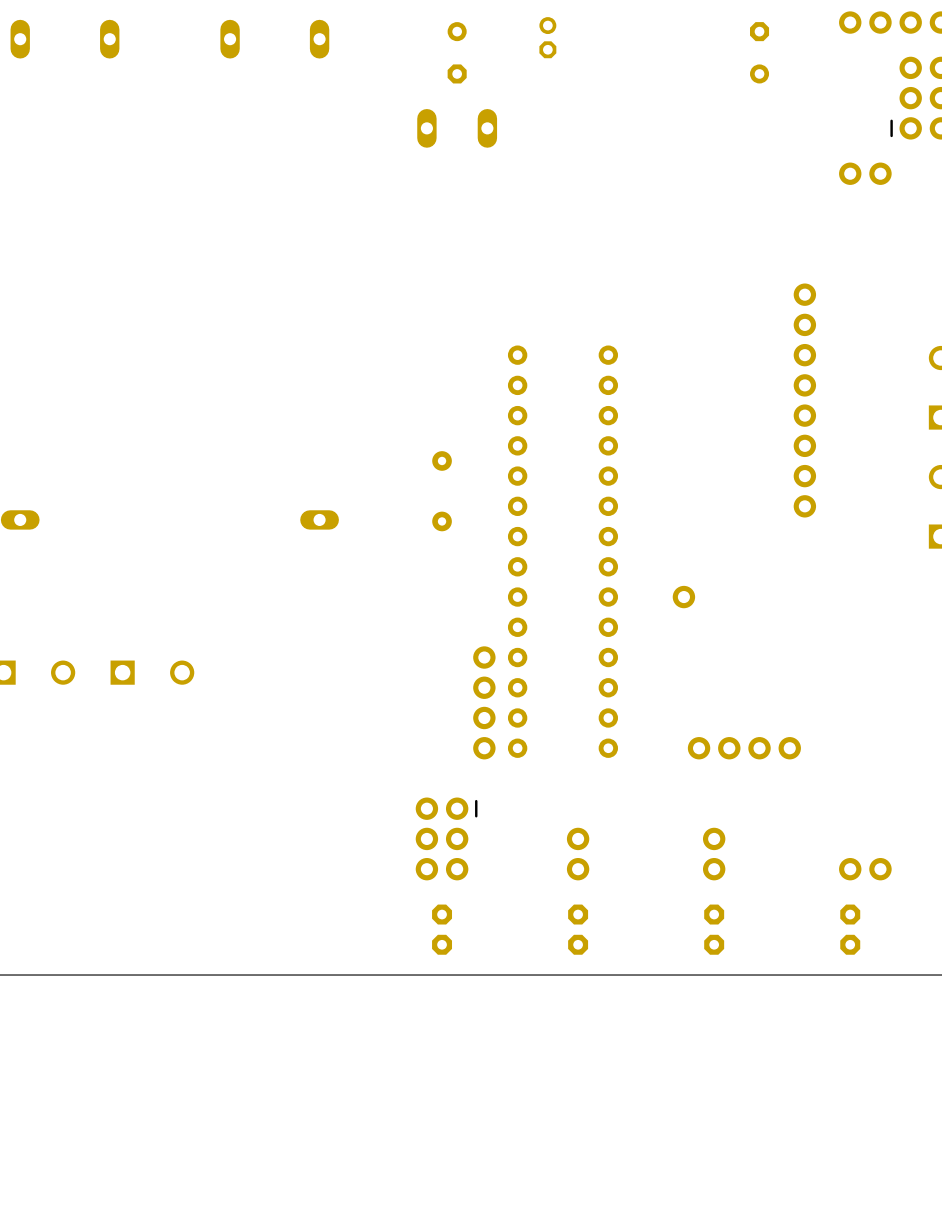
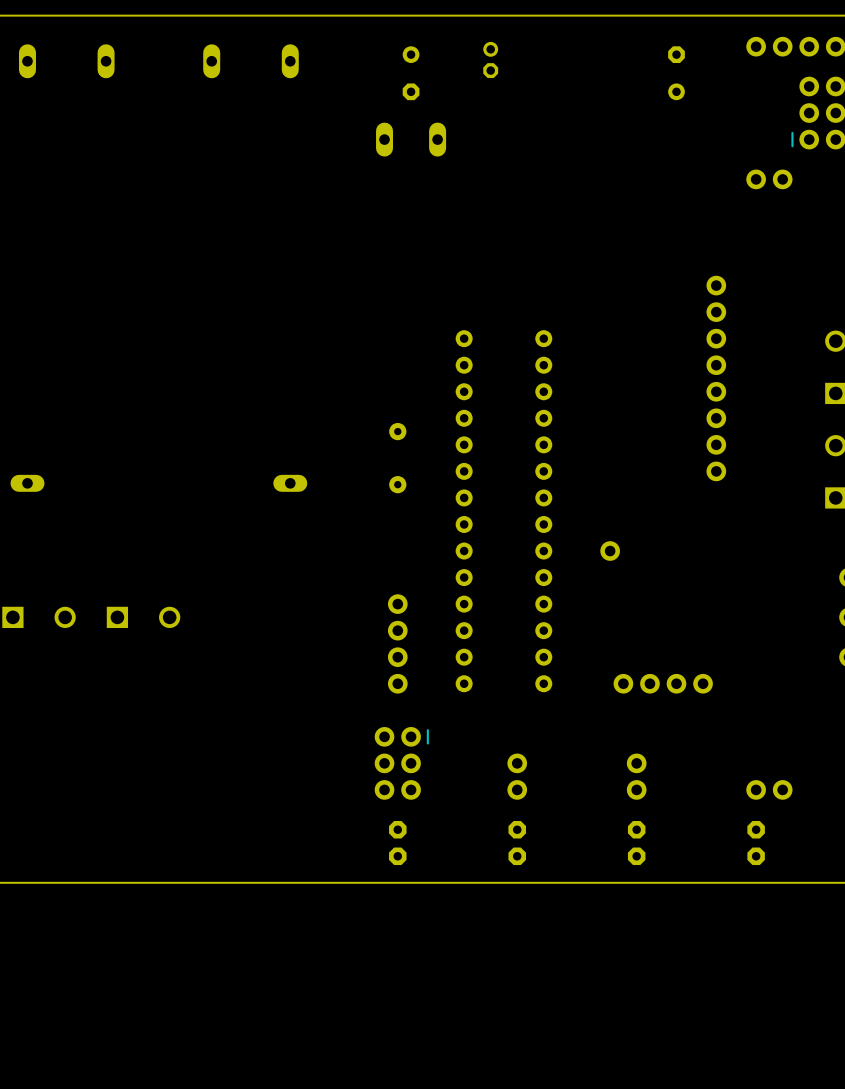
part position: (484, 657) -> (397, 604)
part position: (484, 717) -> (397, 657)

